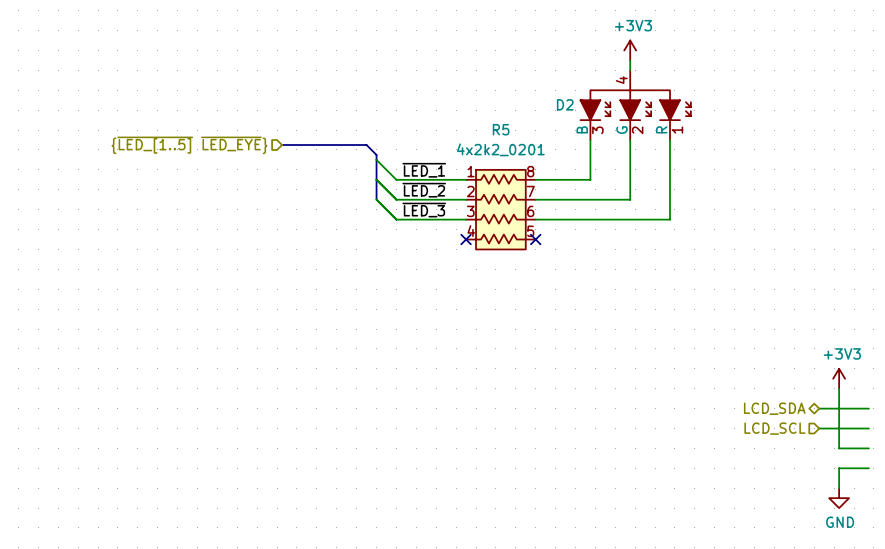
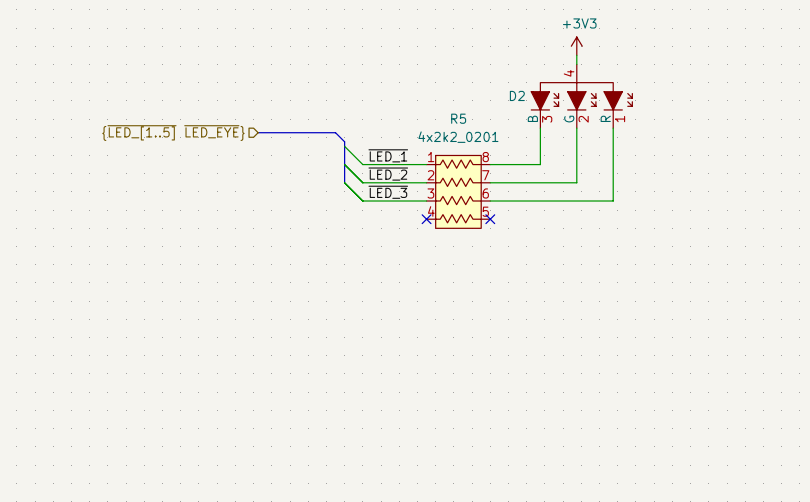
power symbol: +3V3 (839, 378) -> none
wire: (839, 388) (839, 448) (868, 448) -> none
hierarchical label: LCD_SDA (774, 408) -> none
wire: (819, 408) (868, 408) -> none
hierarchical label: LCD_SCL (775, 428) -> none
wire: (819, 428) (868, 428) -> none
wire: (868, 468) (839, 468) (839, 488) -> none
power symbol: GND (839, 498) -> none

